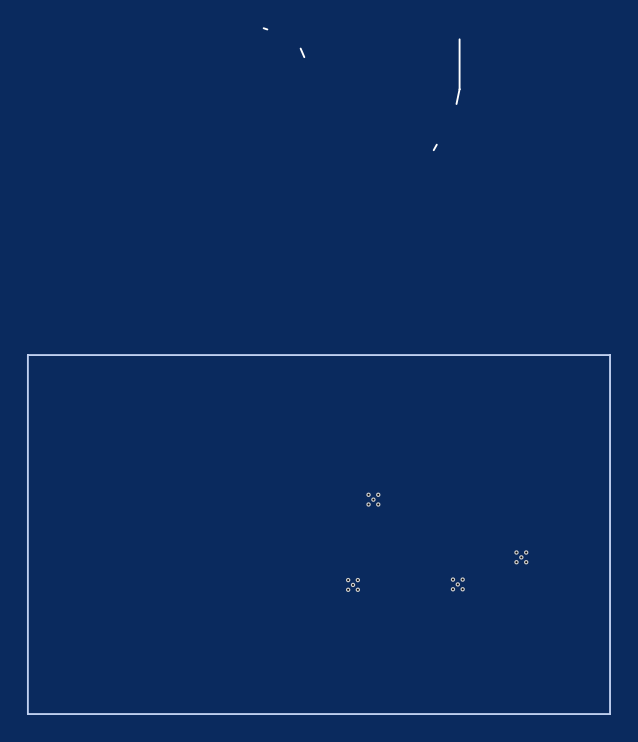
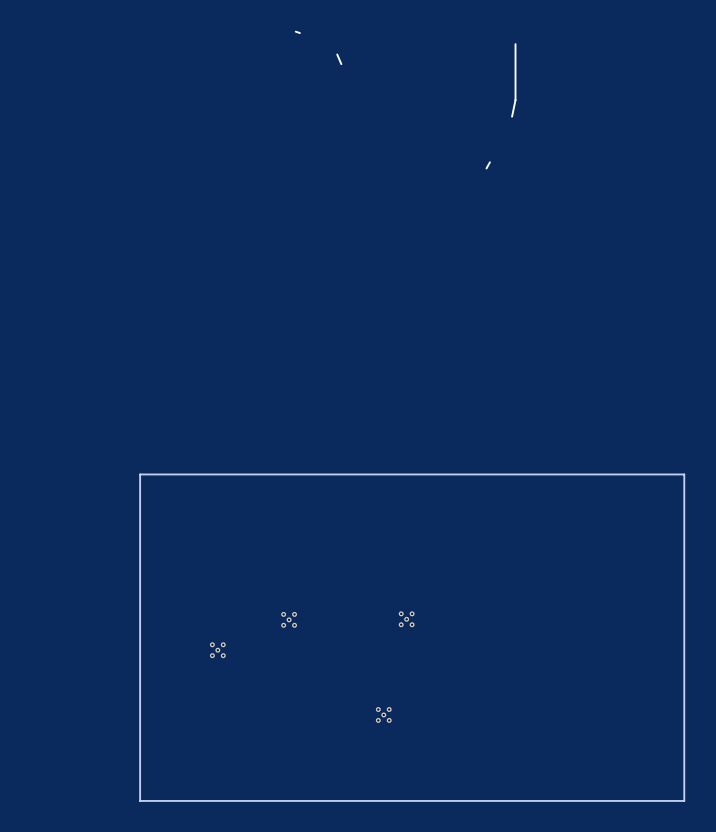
board edge: (610, 422) (610, 355) (27, 355) (27, 714) (124, 714) -> (684, 474) (140, 474) (140, 800)
part: (373, 499) -> none
part: none -> (289, 619)
part: none -> (406, 619)
part: (521, 557) -> none
part: none -> (217, 650)
part: (353, 584) -> none
part: (457, 584) -> none
part: none -> (383, 714)

